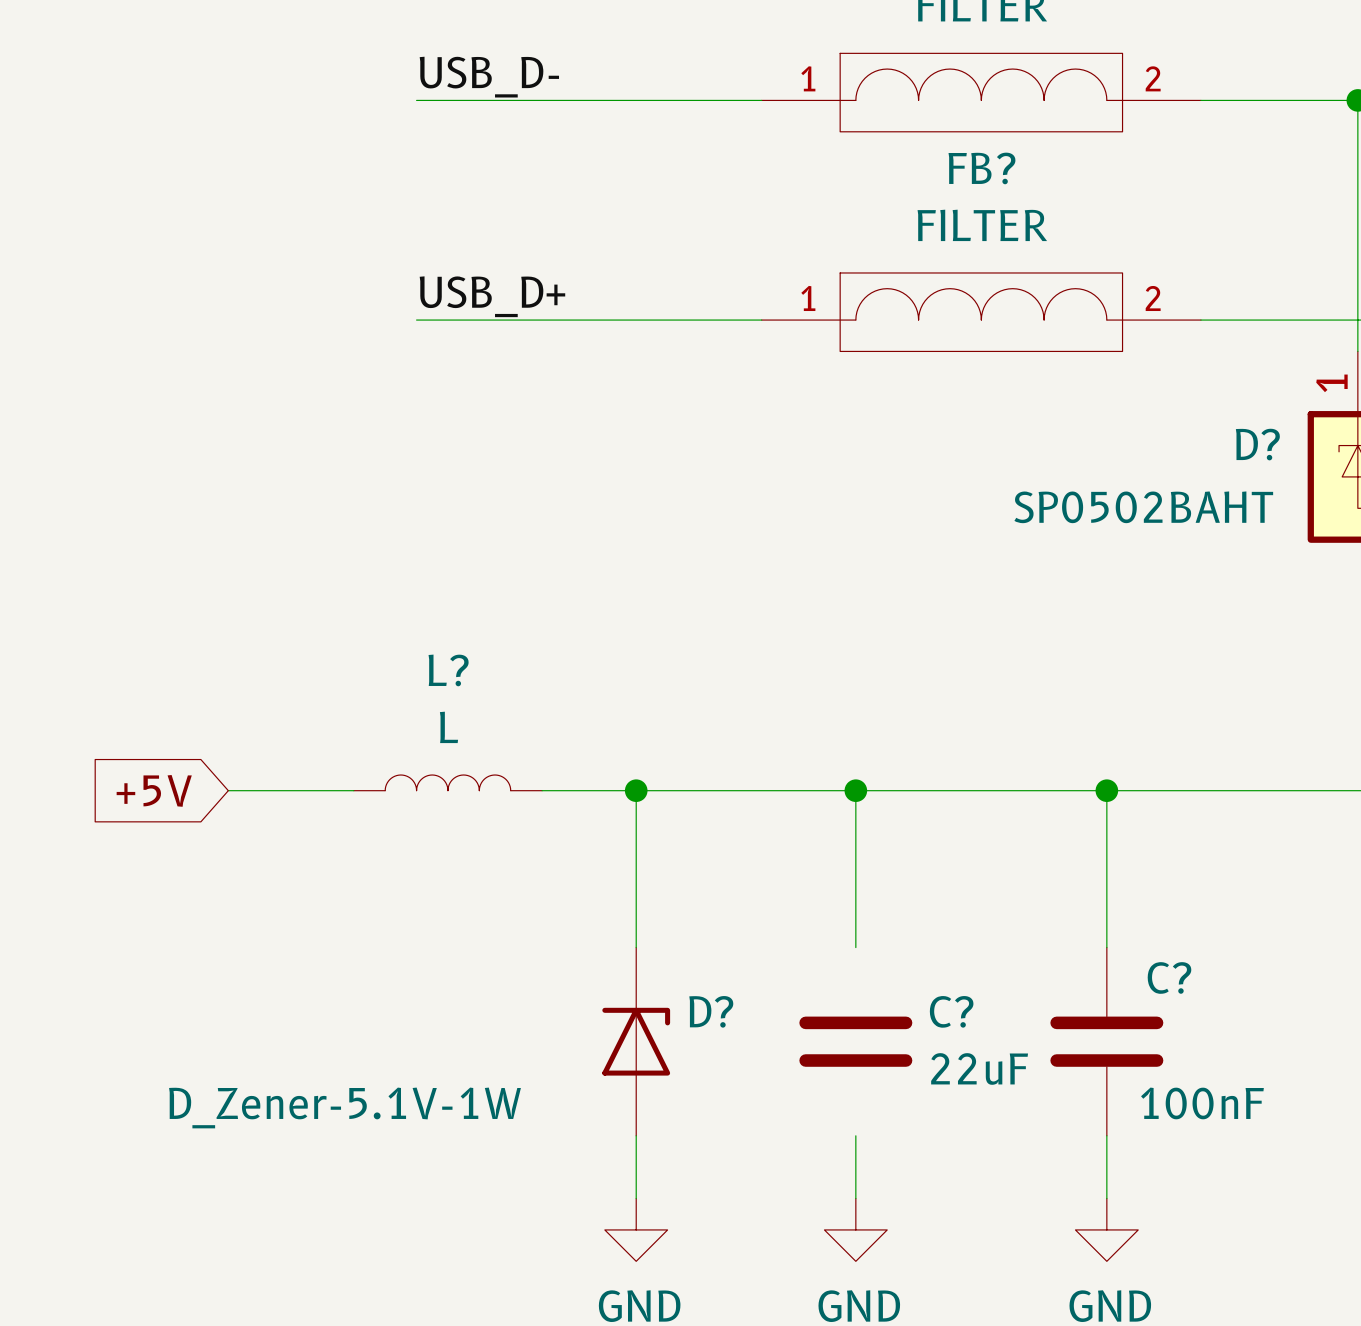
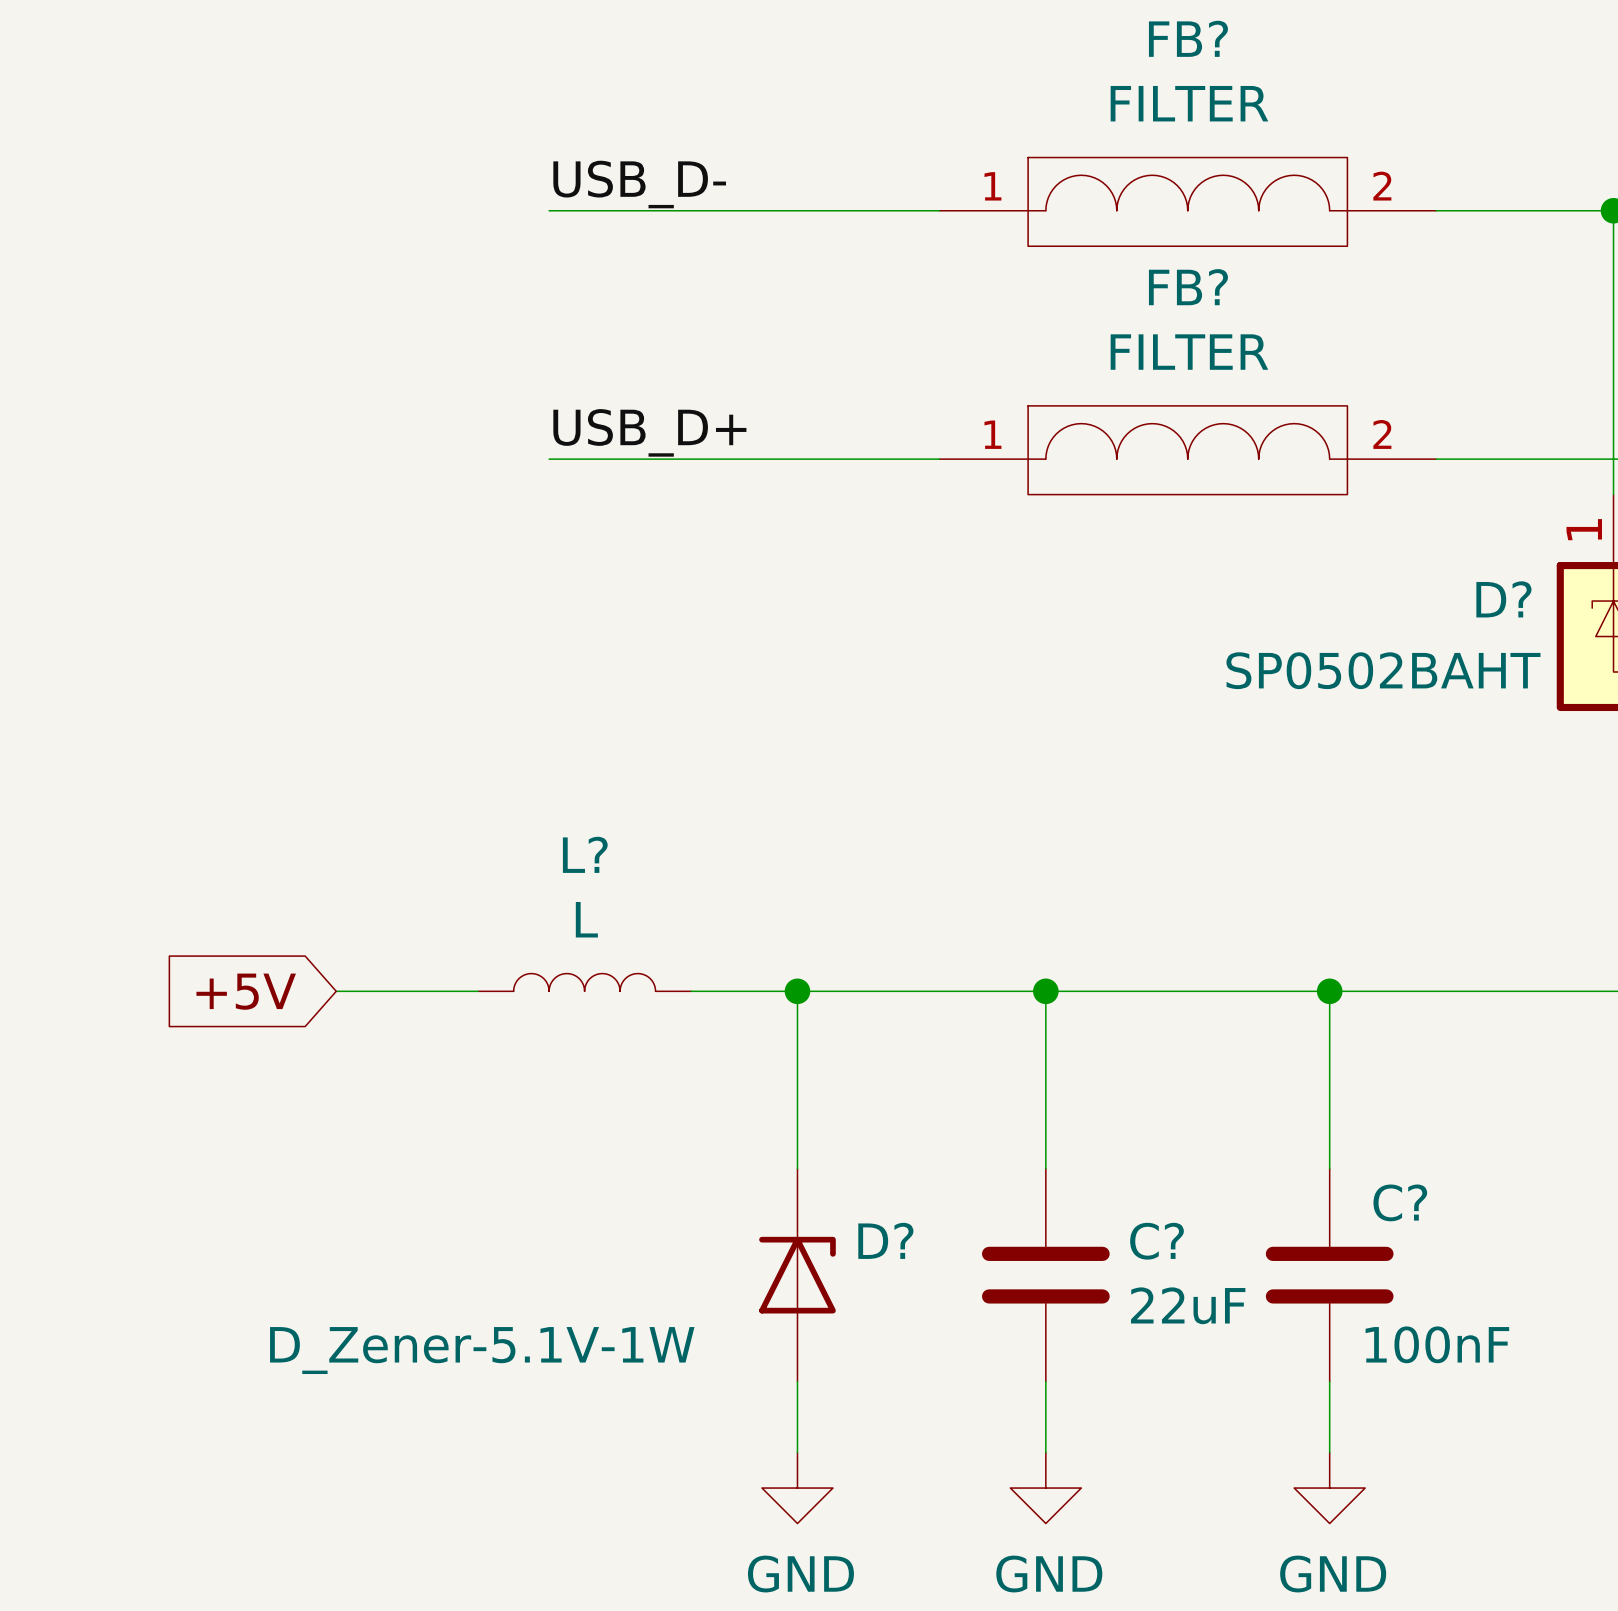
C? symbol: [799, 1016, 913, 1067] -> [981, 1168, 1110, 1382]

